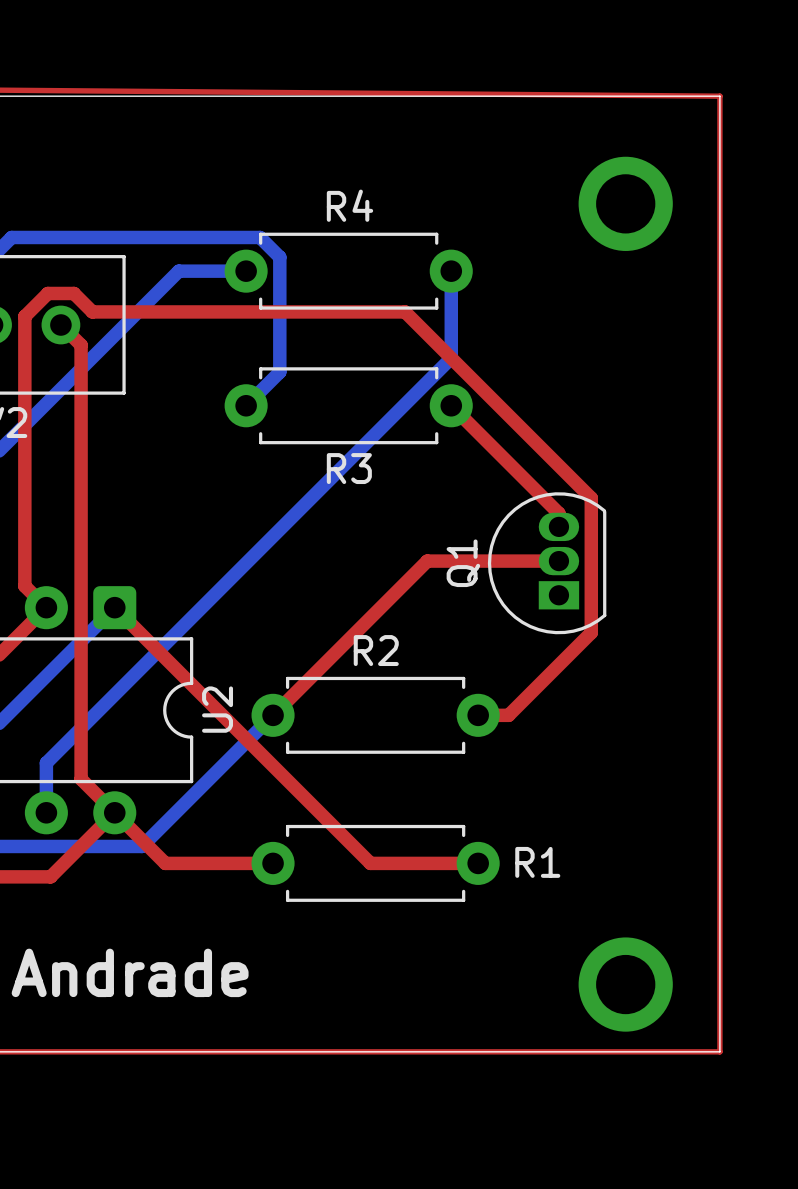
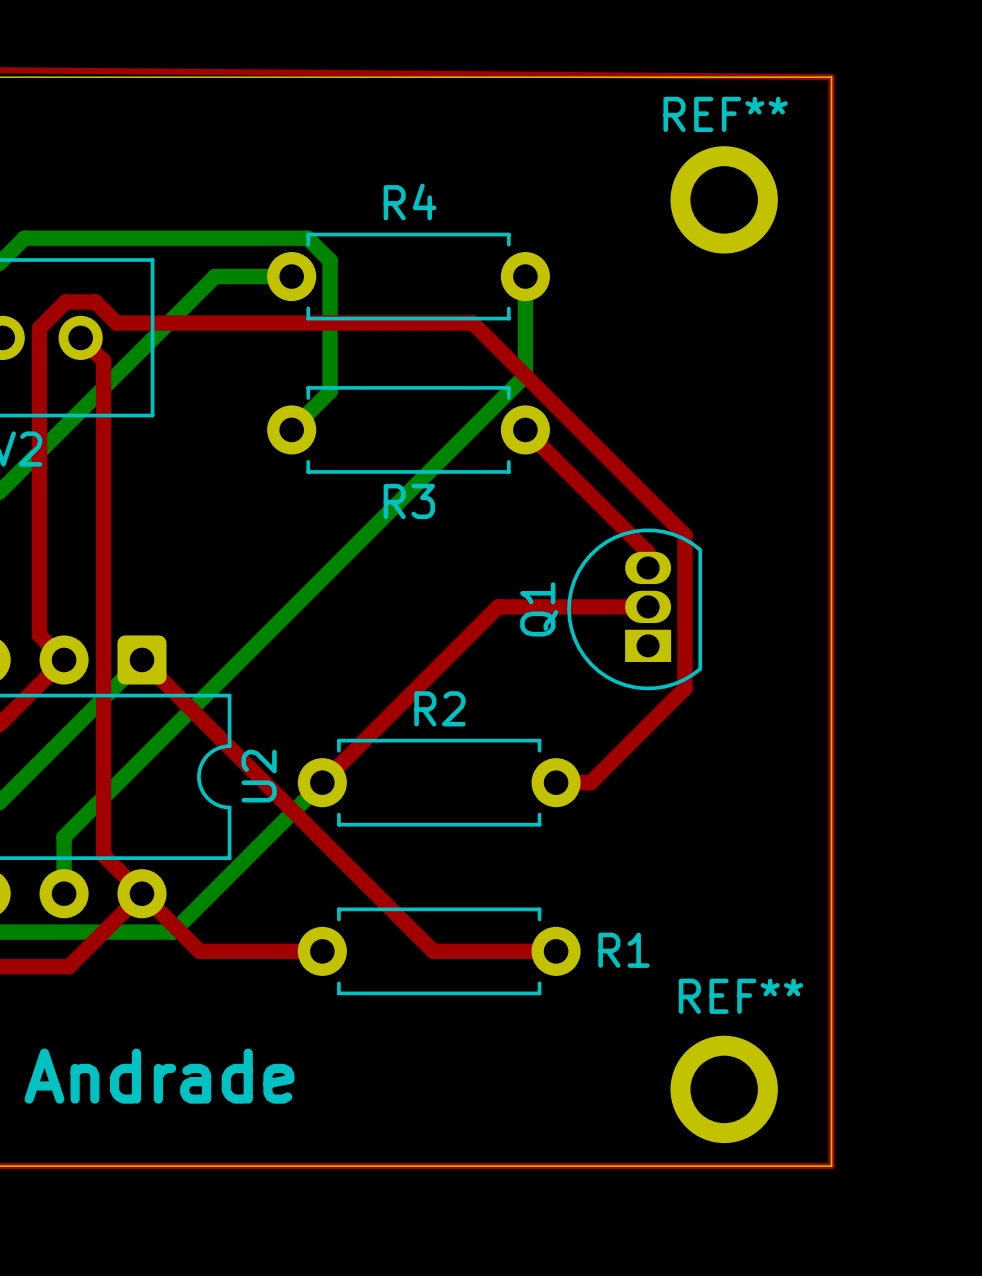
REF** name: none -> REF** (725, 114)
REF** name: none -> REF** (740, 996)

